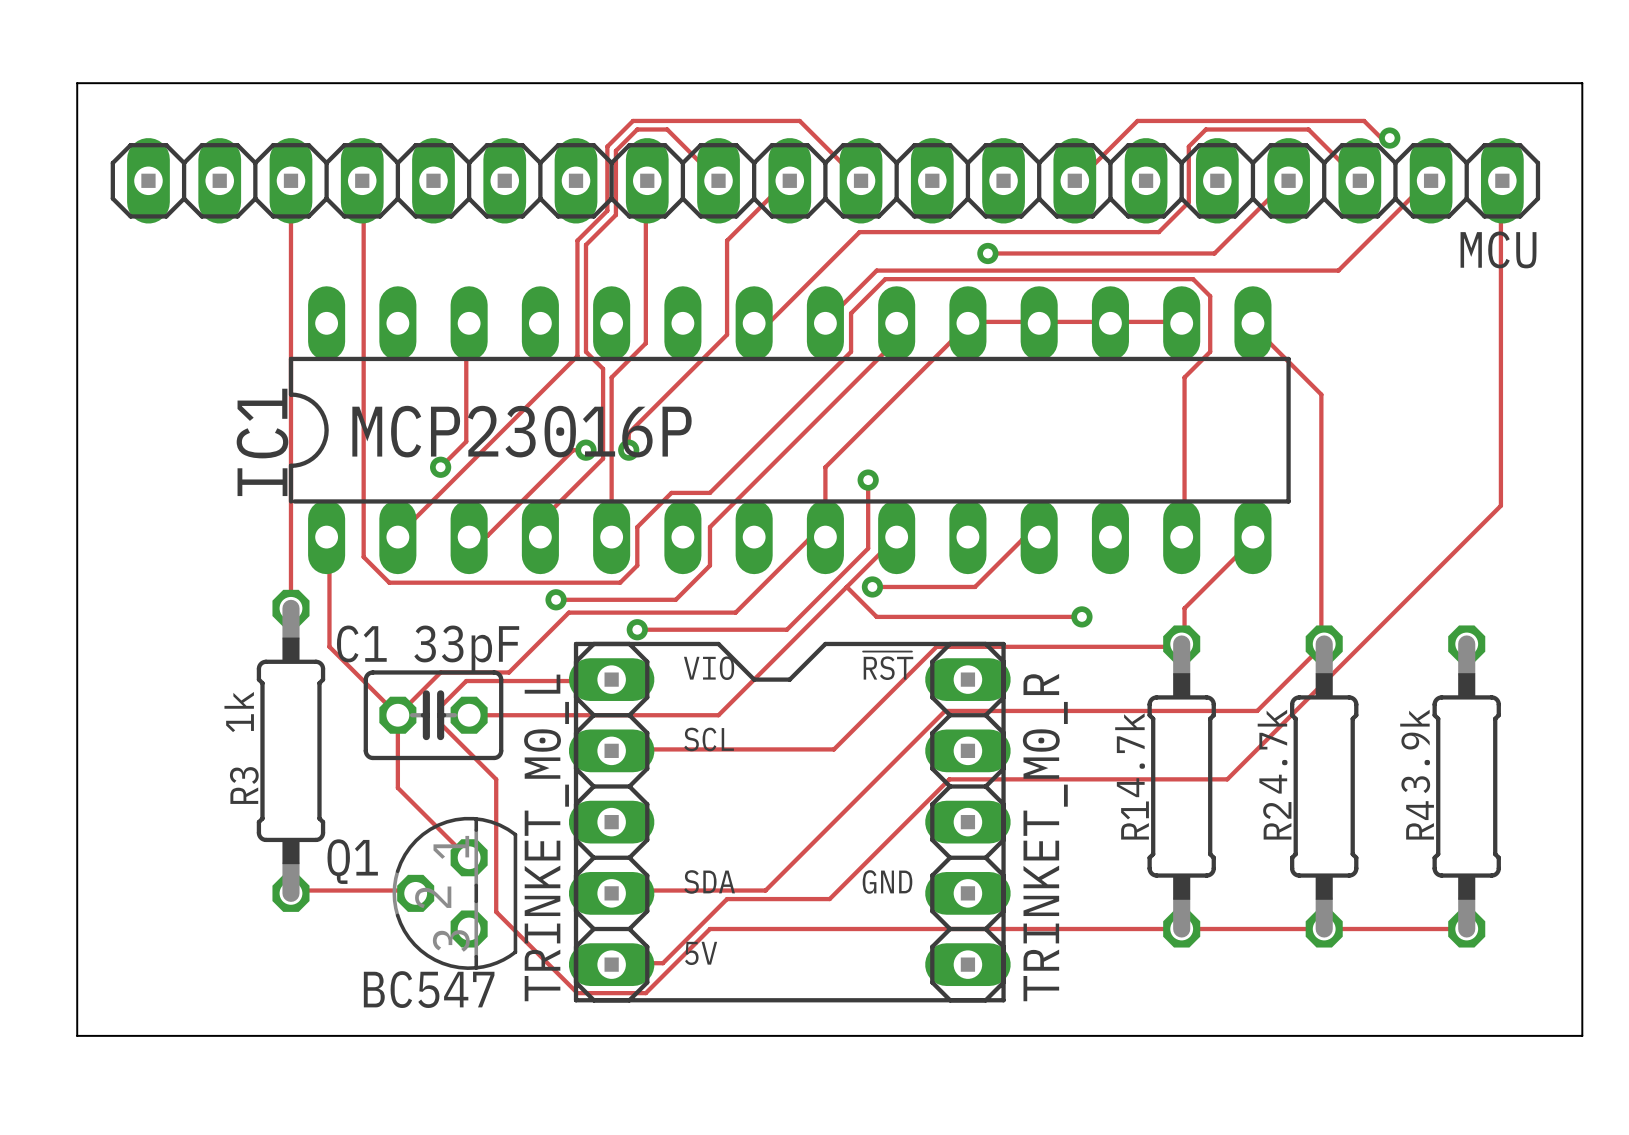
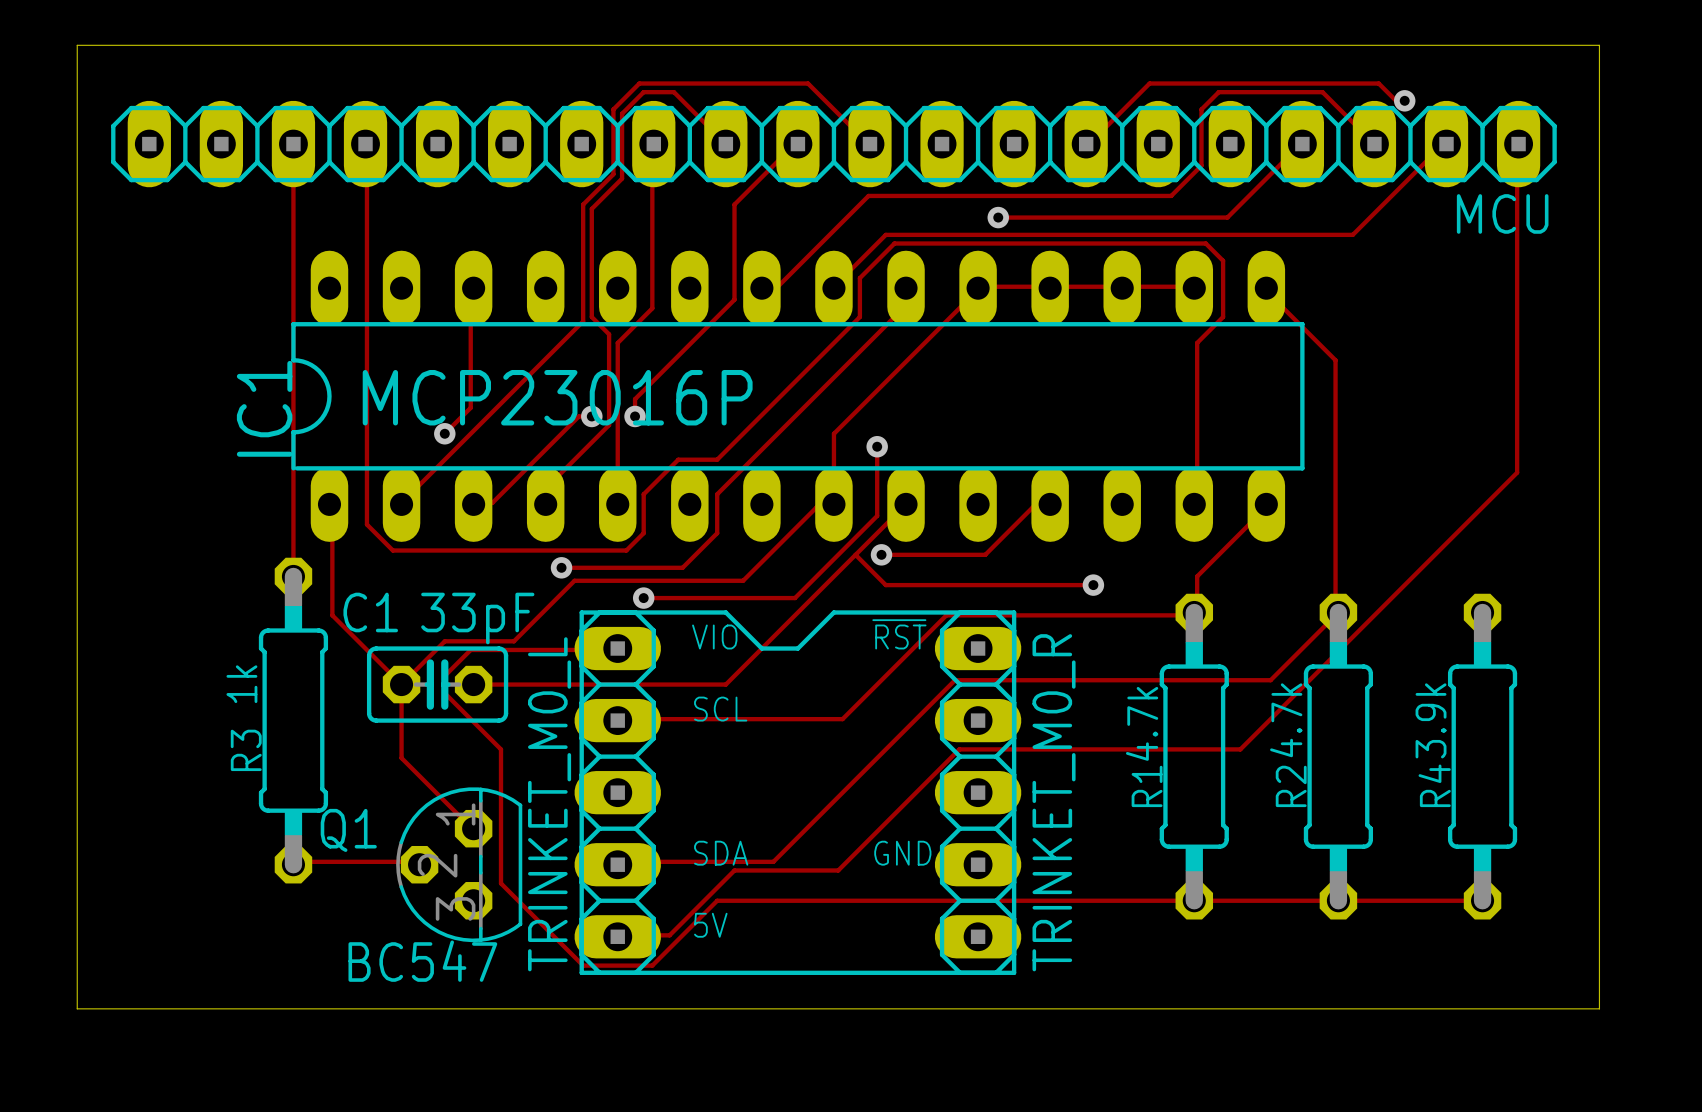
C1 footprint: [363, 670, 504, 761] -> [366, 646, 509, 723]

